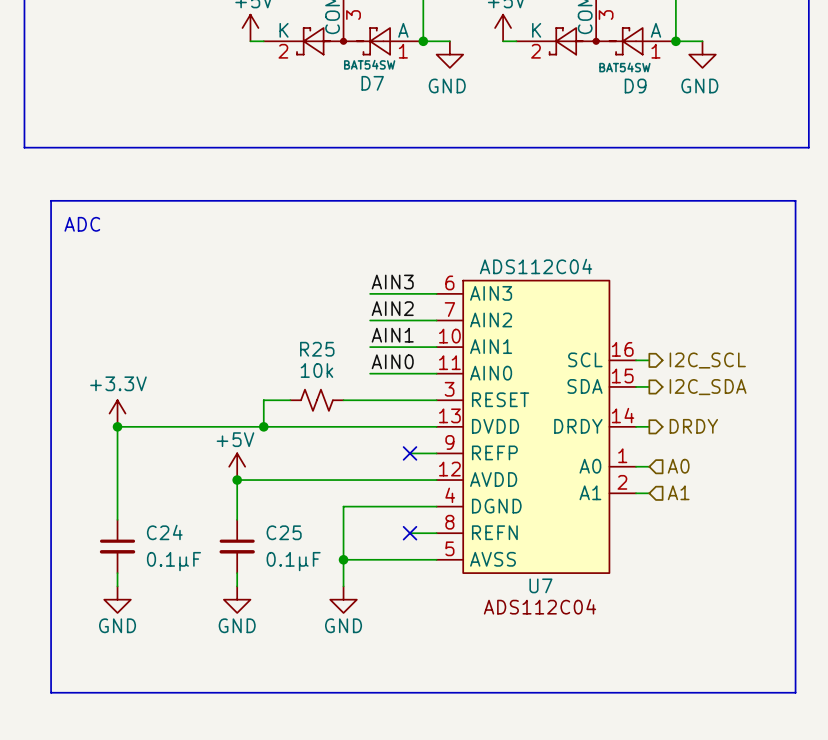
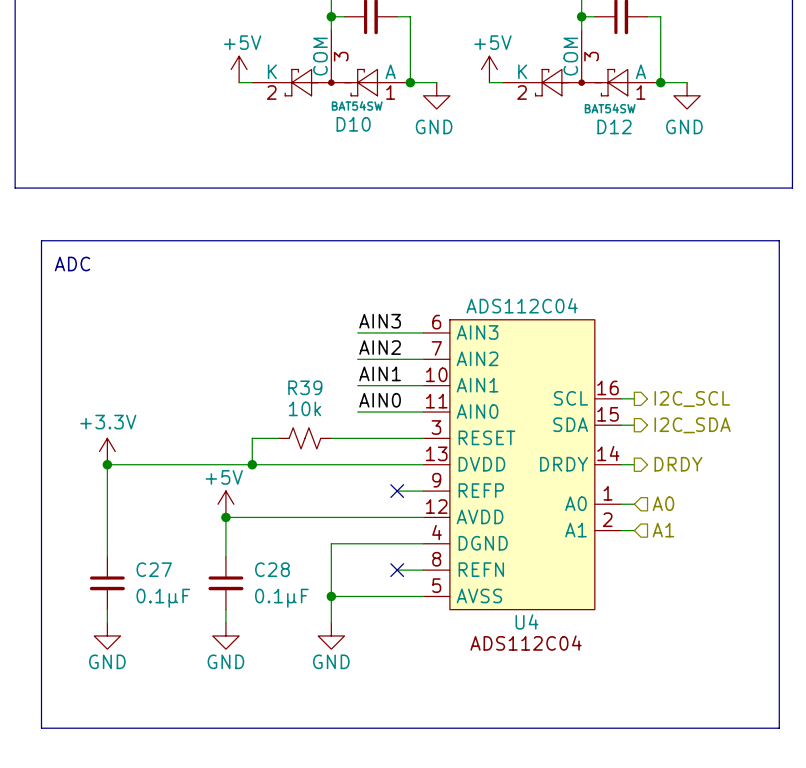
D7 name: D7 (372, 83) -> D10 (353, 124)
D9 name: D9 (635, 86) -> D12 (614, 126)
R25 name: R25 (317, 349) -> R39 (305, 387)
C24 name: C24 (164, 532) -> C27 (154, 569)
C25 name: C25 (284, 532) -> C28 (272, 569)
U7 name: U7 (540, 585) -> U4 (526, 622)

